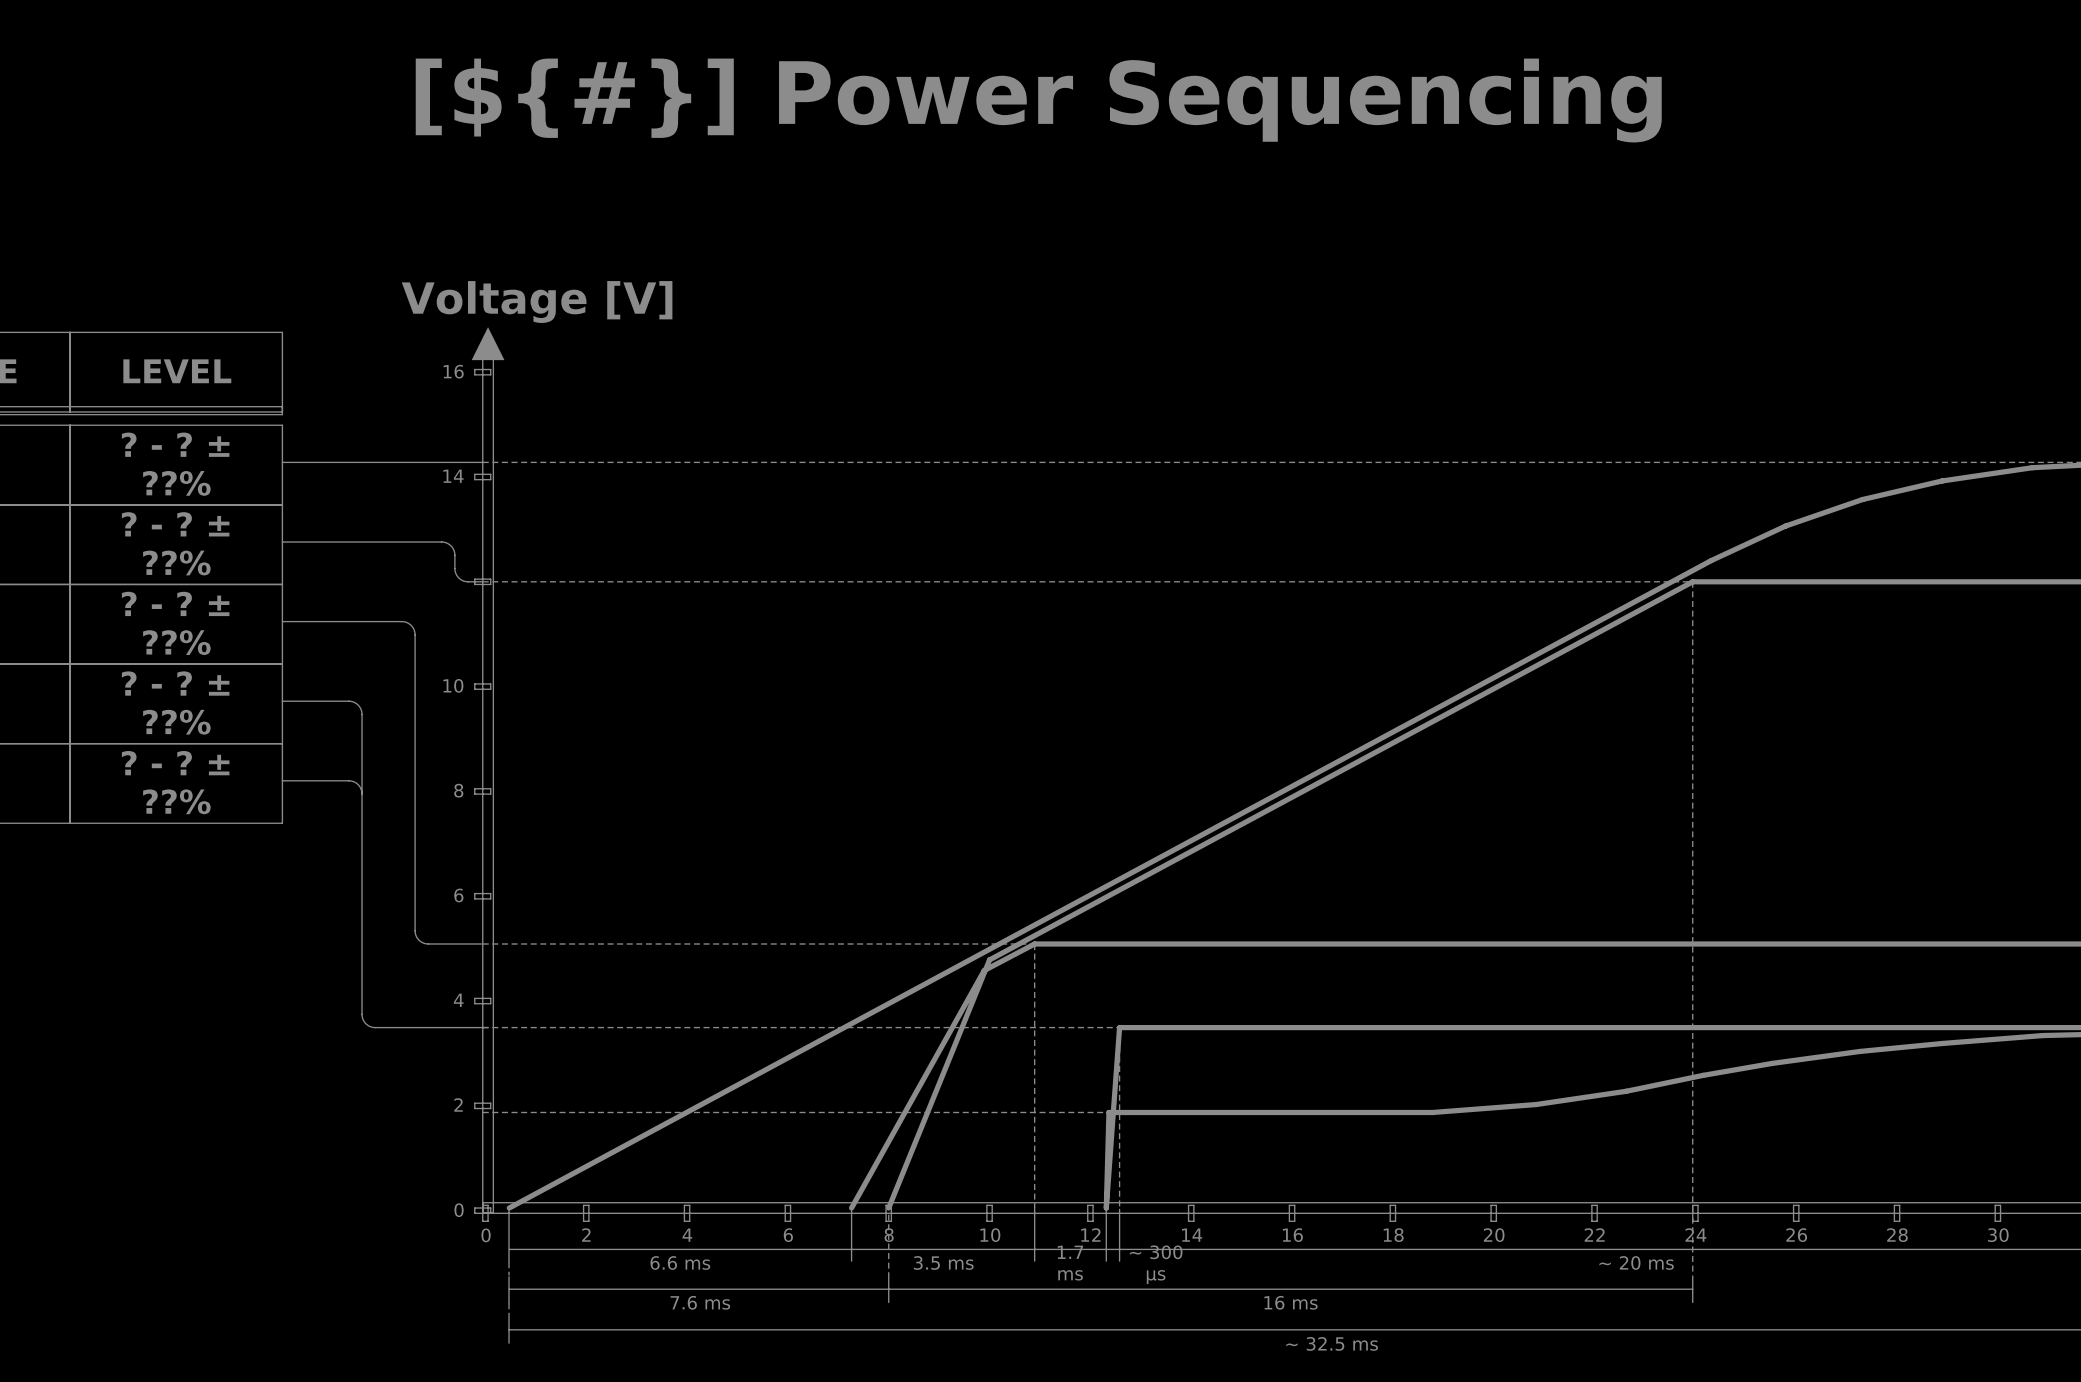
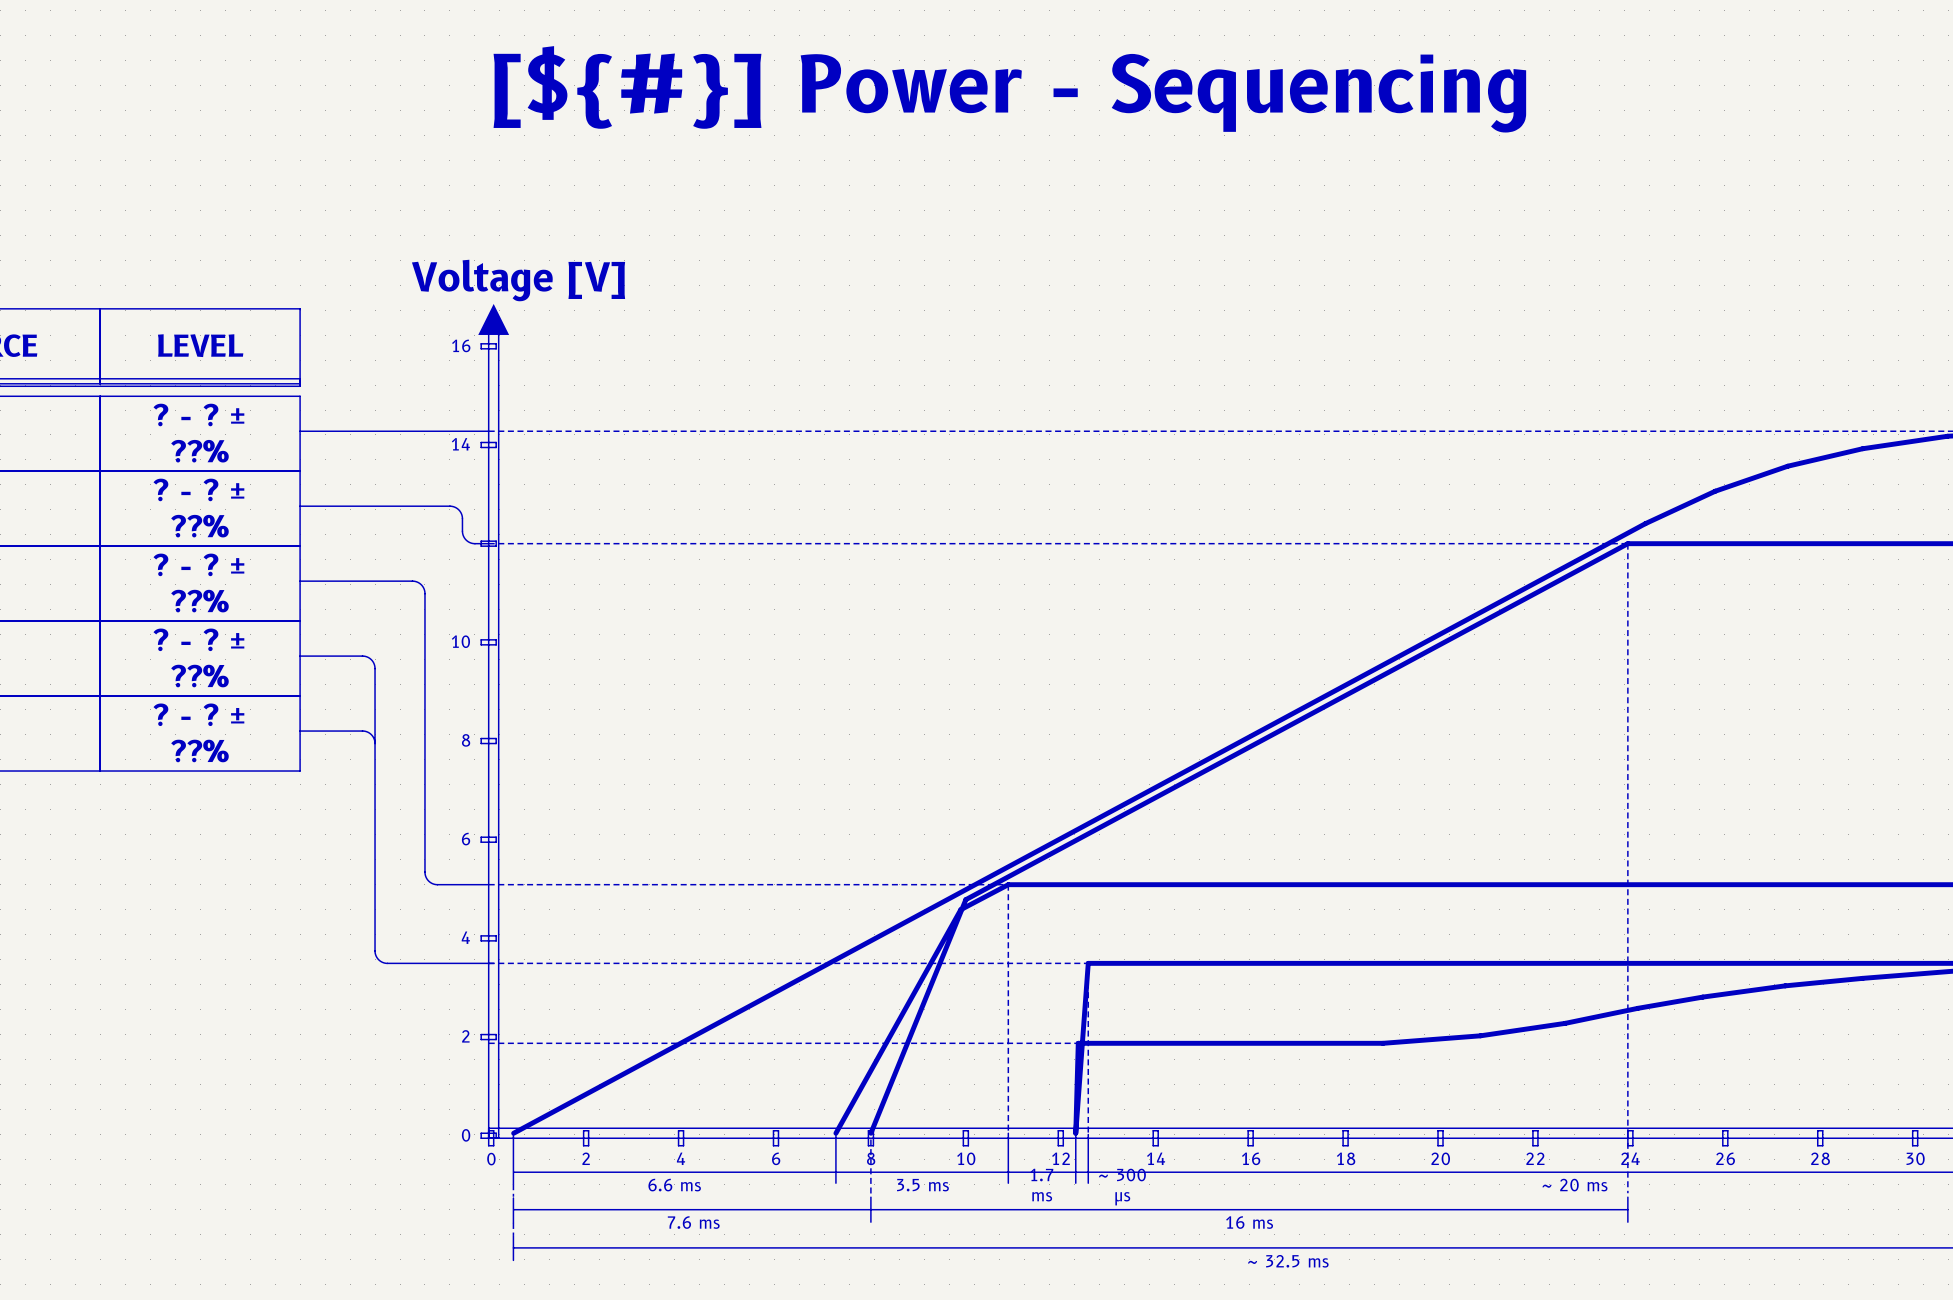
text: [${#}] Power Sequencing (1038, 100) -> [${#}] Power - Sequencing (1009, 89)

